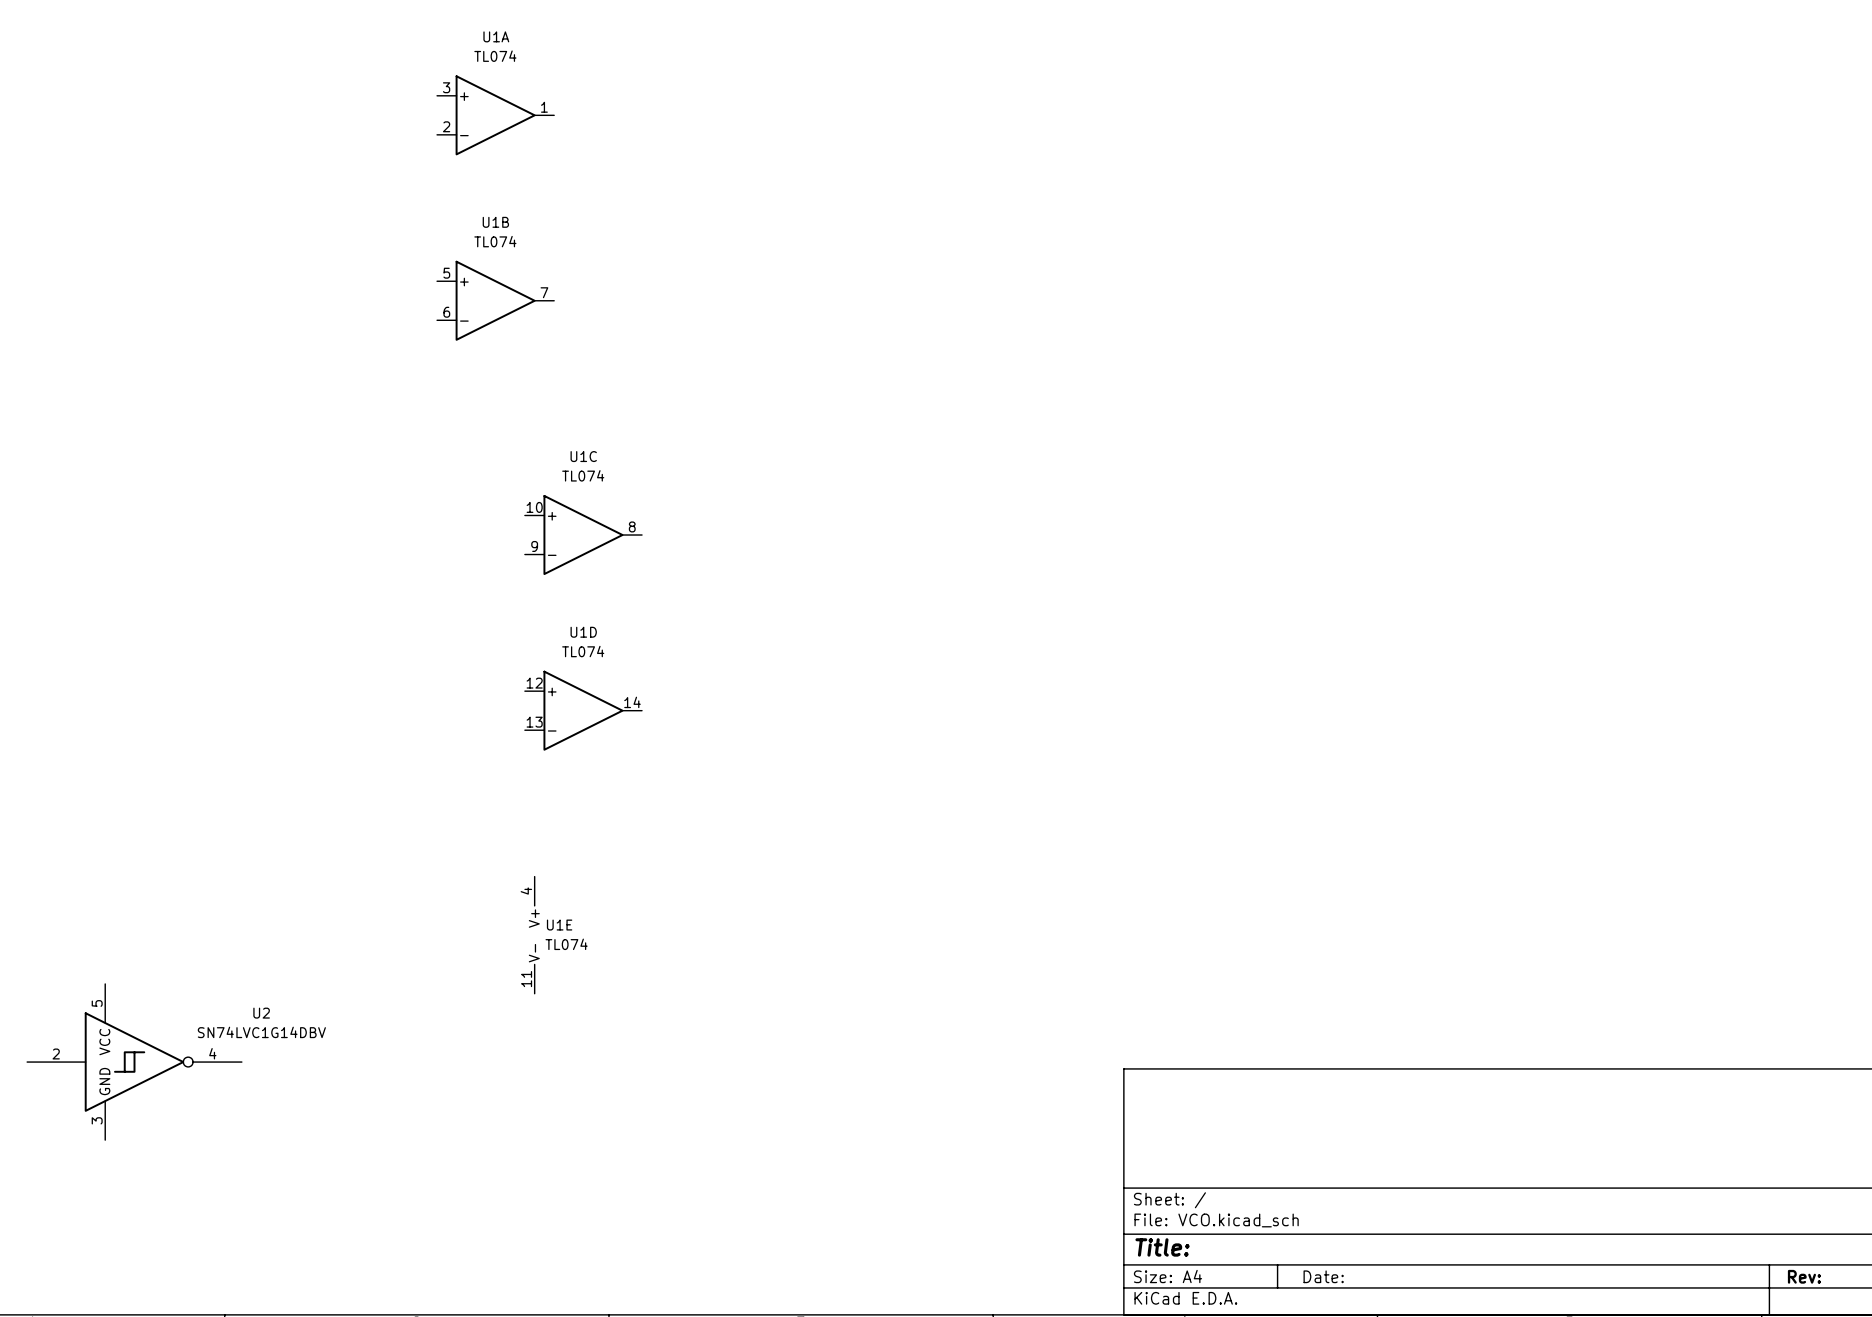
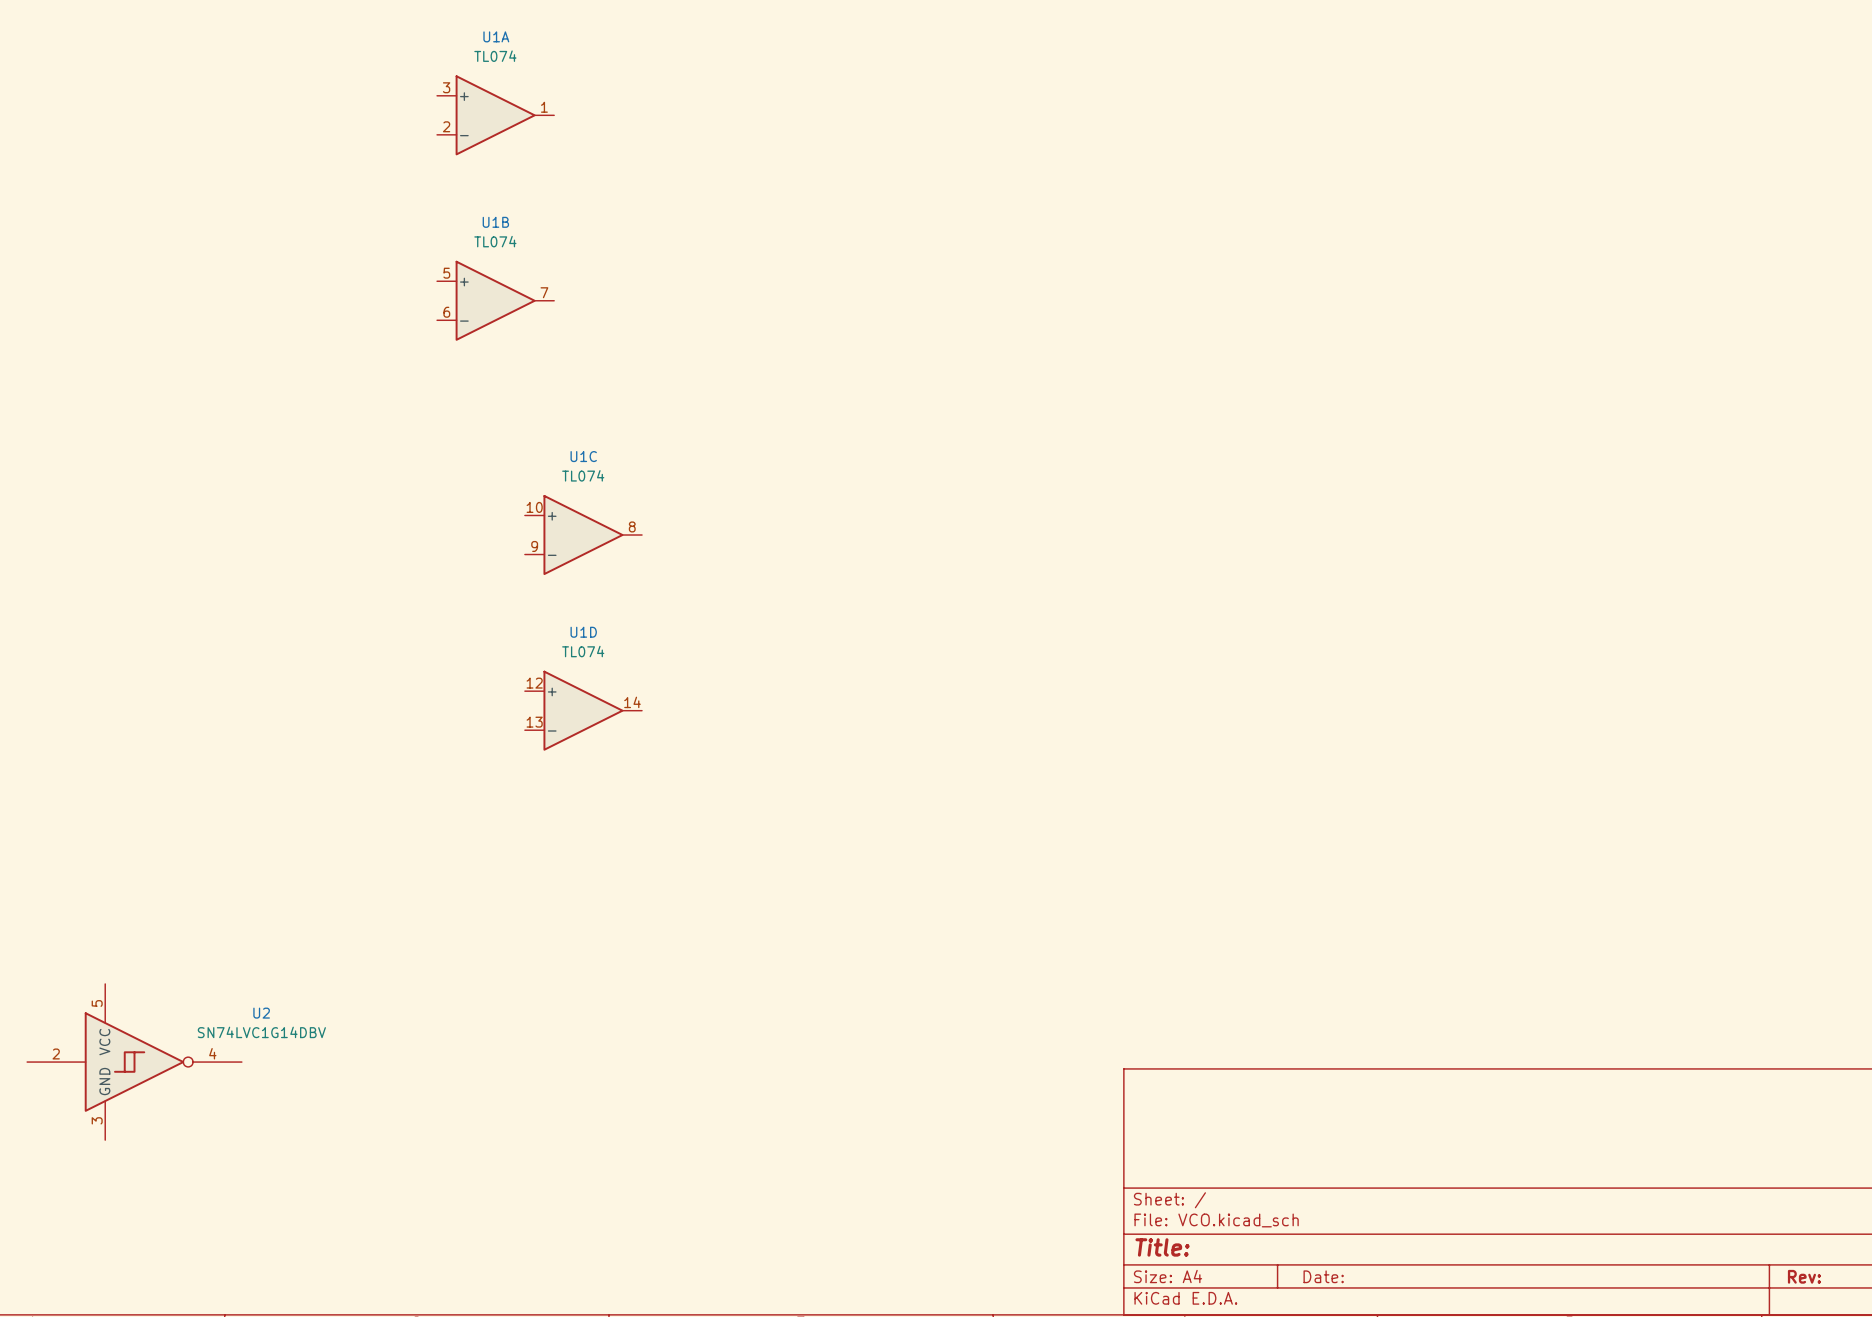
U1E: TL074 (534, 935) -> none

